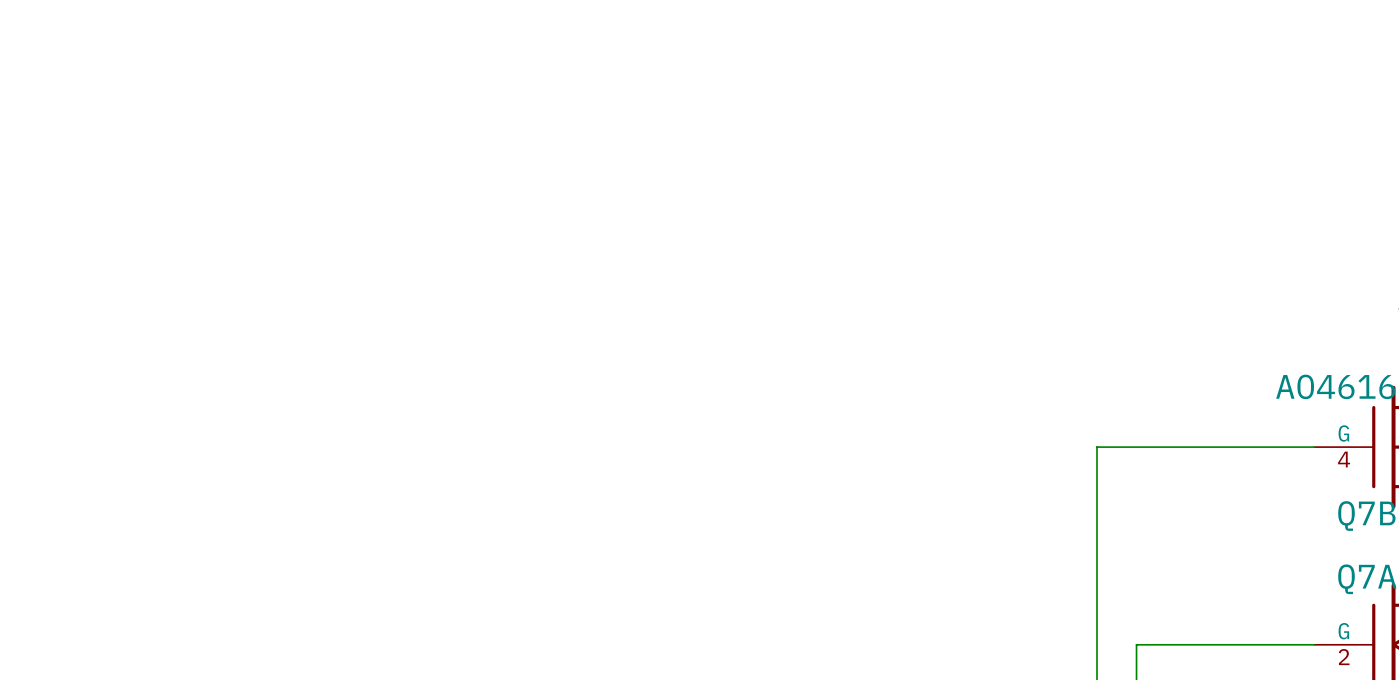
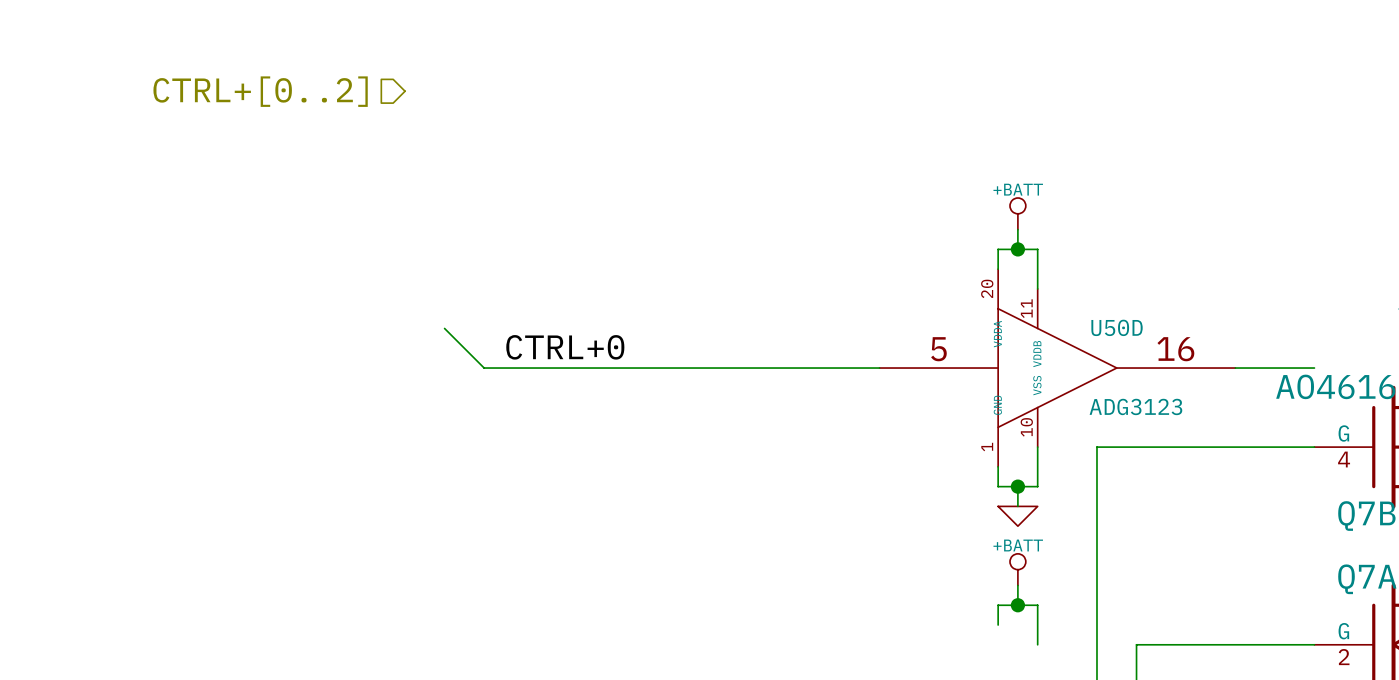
hierarchical label: none -> CTRL+[0..2] (260, 91)
power symbol: none -> +BATT (1017, 213)
wire: none -> (1017, 229) (1017, 249)
junction: none -> (1017, 249)
wire: none -> (998, 269) (998, 249) (1037, 249) (1037, 288)
wire: none -> (444, 328) (484, 368) (879, 368)
label: none -> CTRL+0 (565, 347)
U50D: none -> ADG3123 (1057, 368)
wire: none -> (1235, 368) (1314, 368)
wire: none -> (1037, 447) (1037, 486) (998, 486) (998, 466)
wire: none -> (1017, 486) (1017, 506)
junction: none -> (1017, 486)
power symbol: none -> (1017, 516)
power symbol: none -> +BATT (1017, 569)
wire: none -> (1017, 585) (1017, 605)
junction: none -> (1017, 605)
wire: none -> (998, 625) (998, 605) (1037, 605) (1037, 644)

